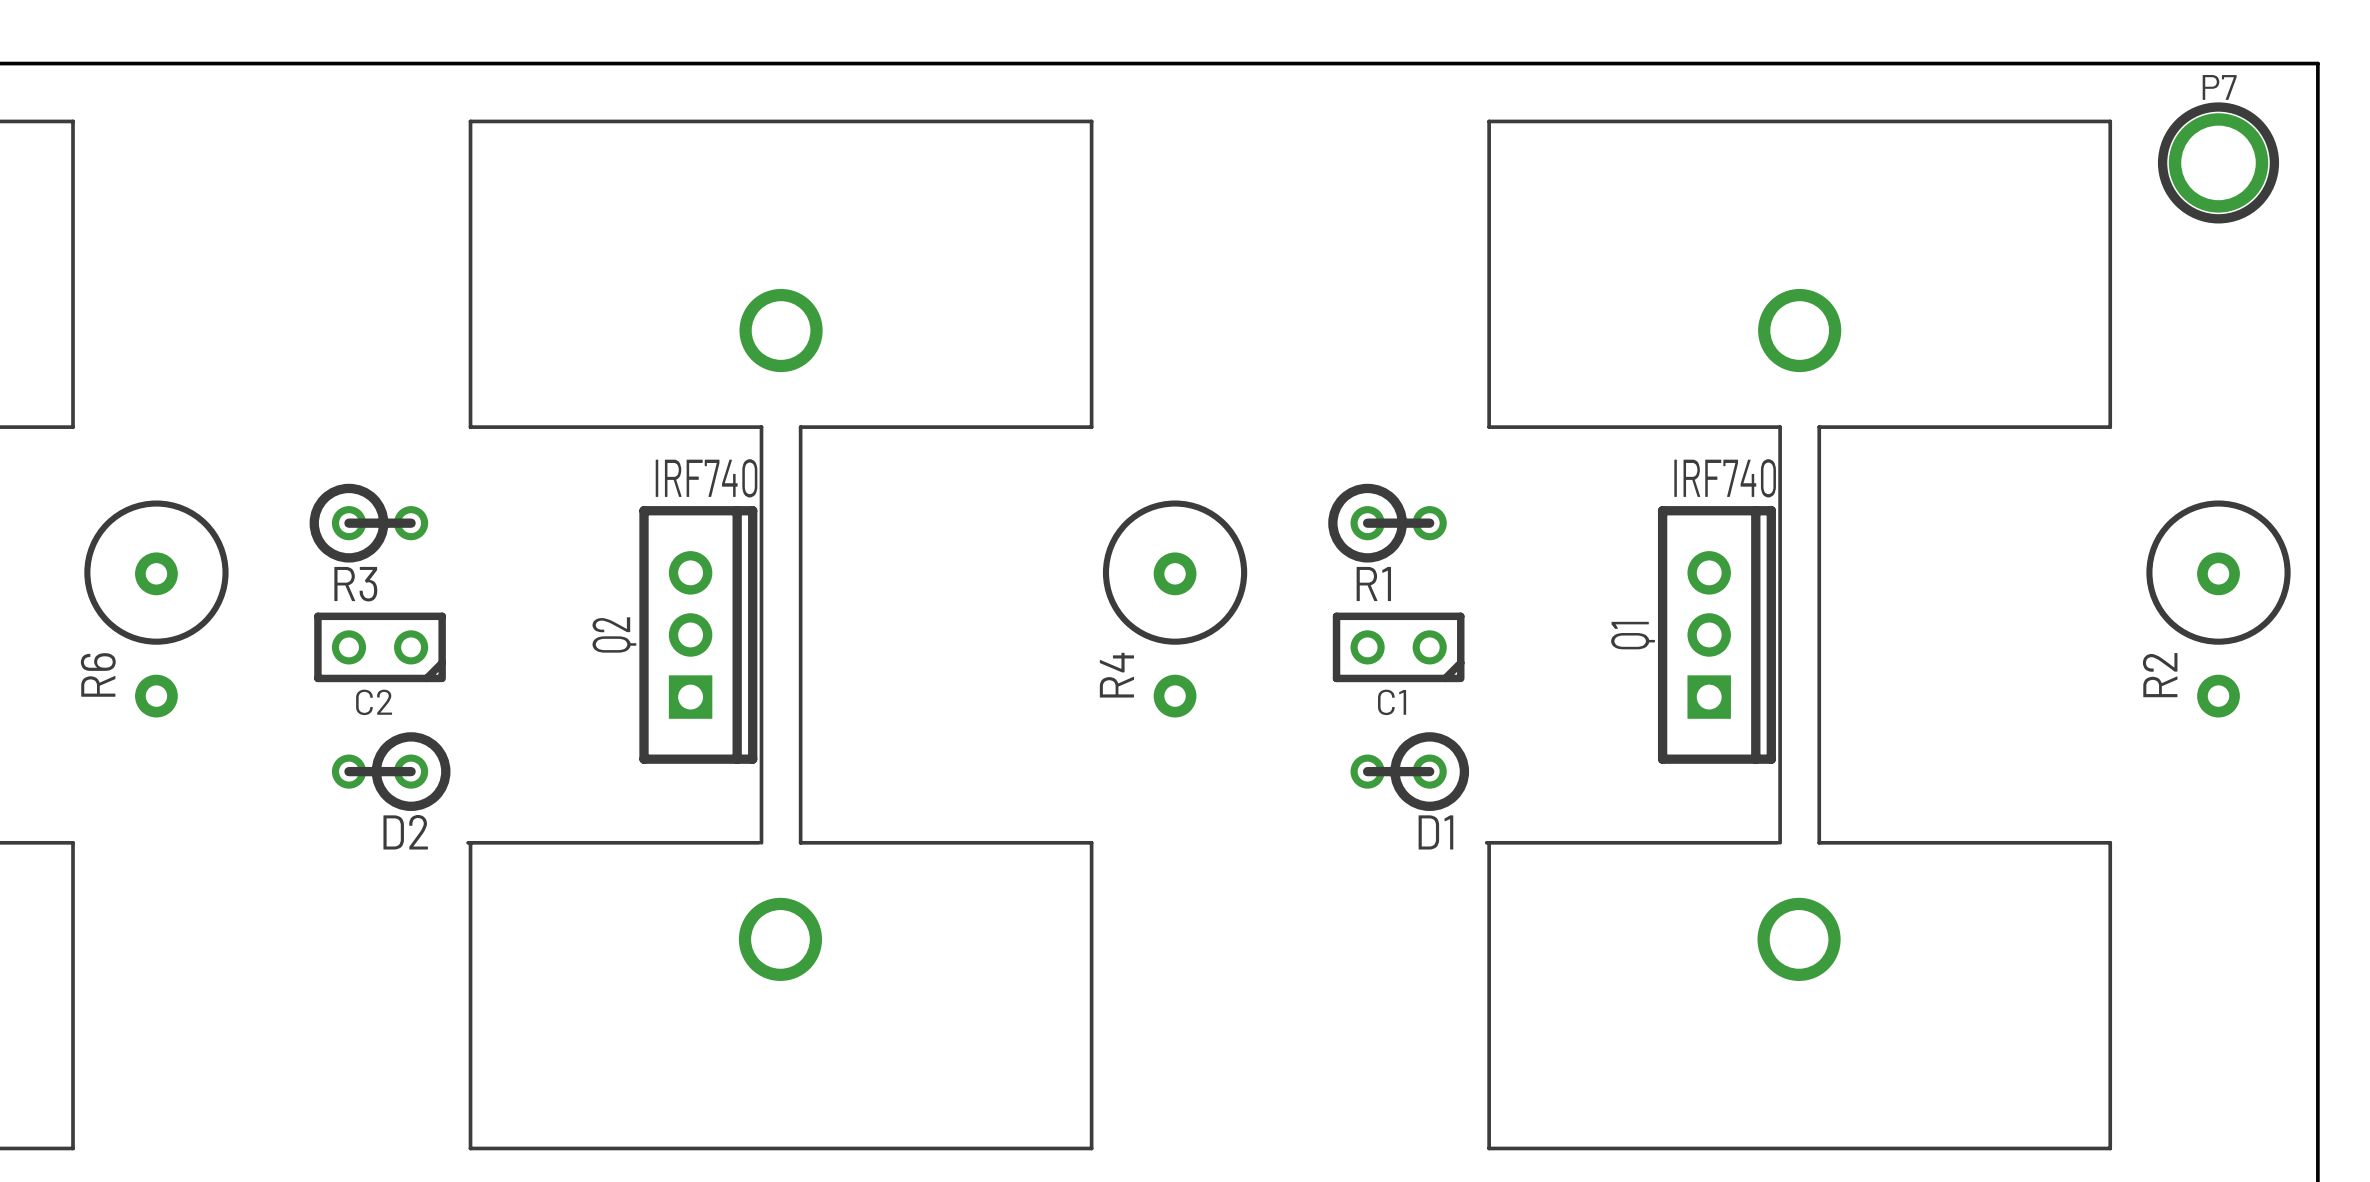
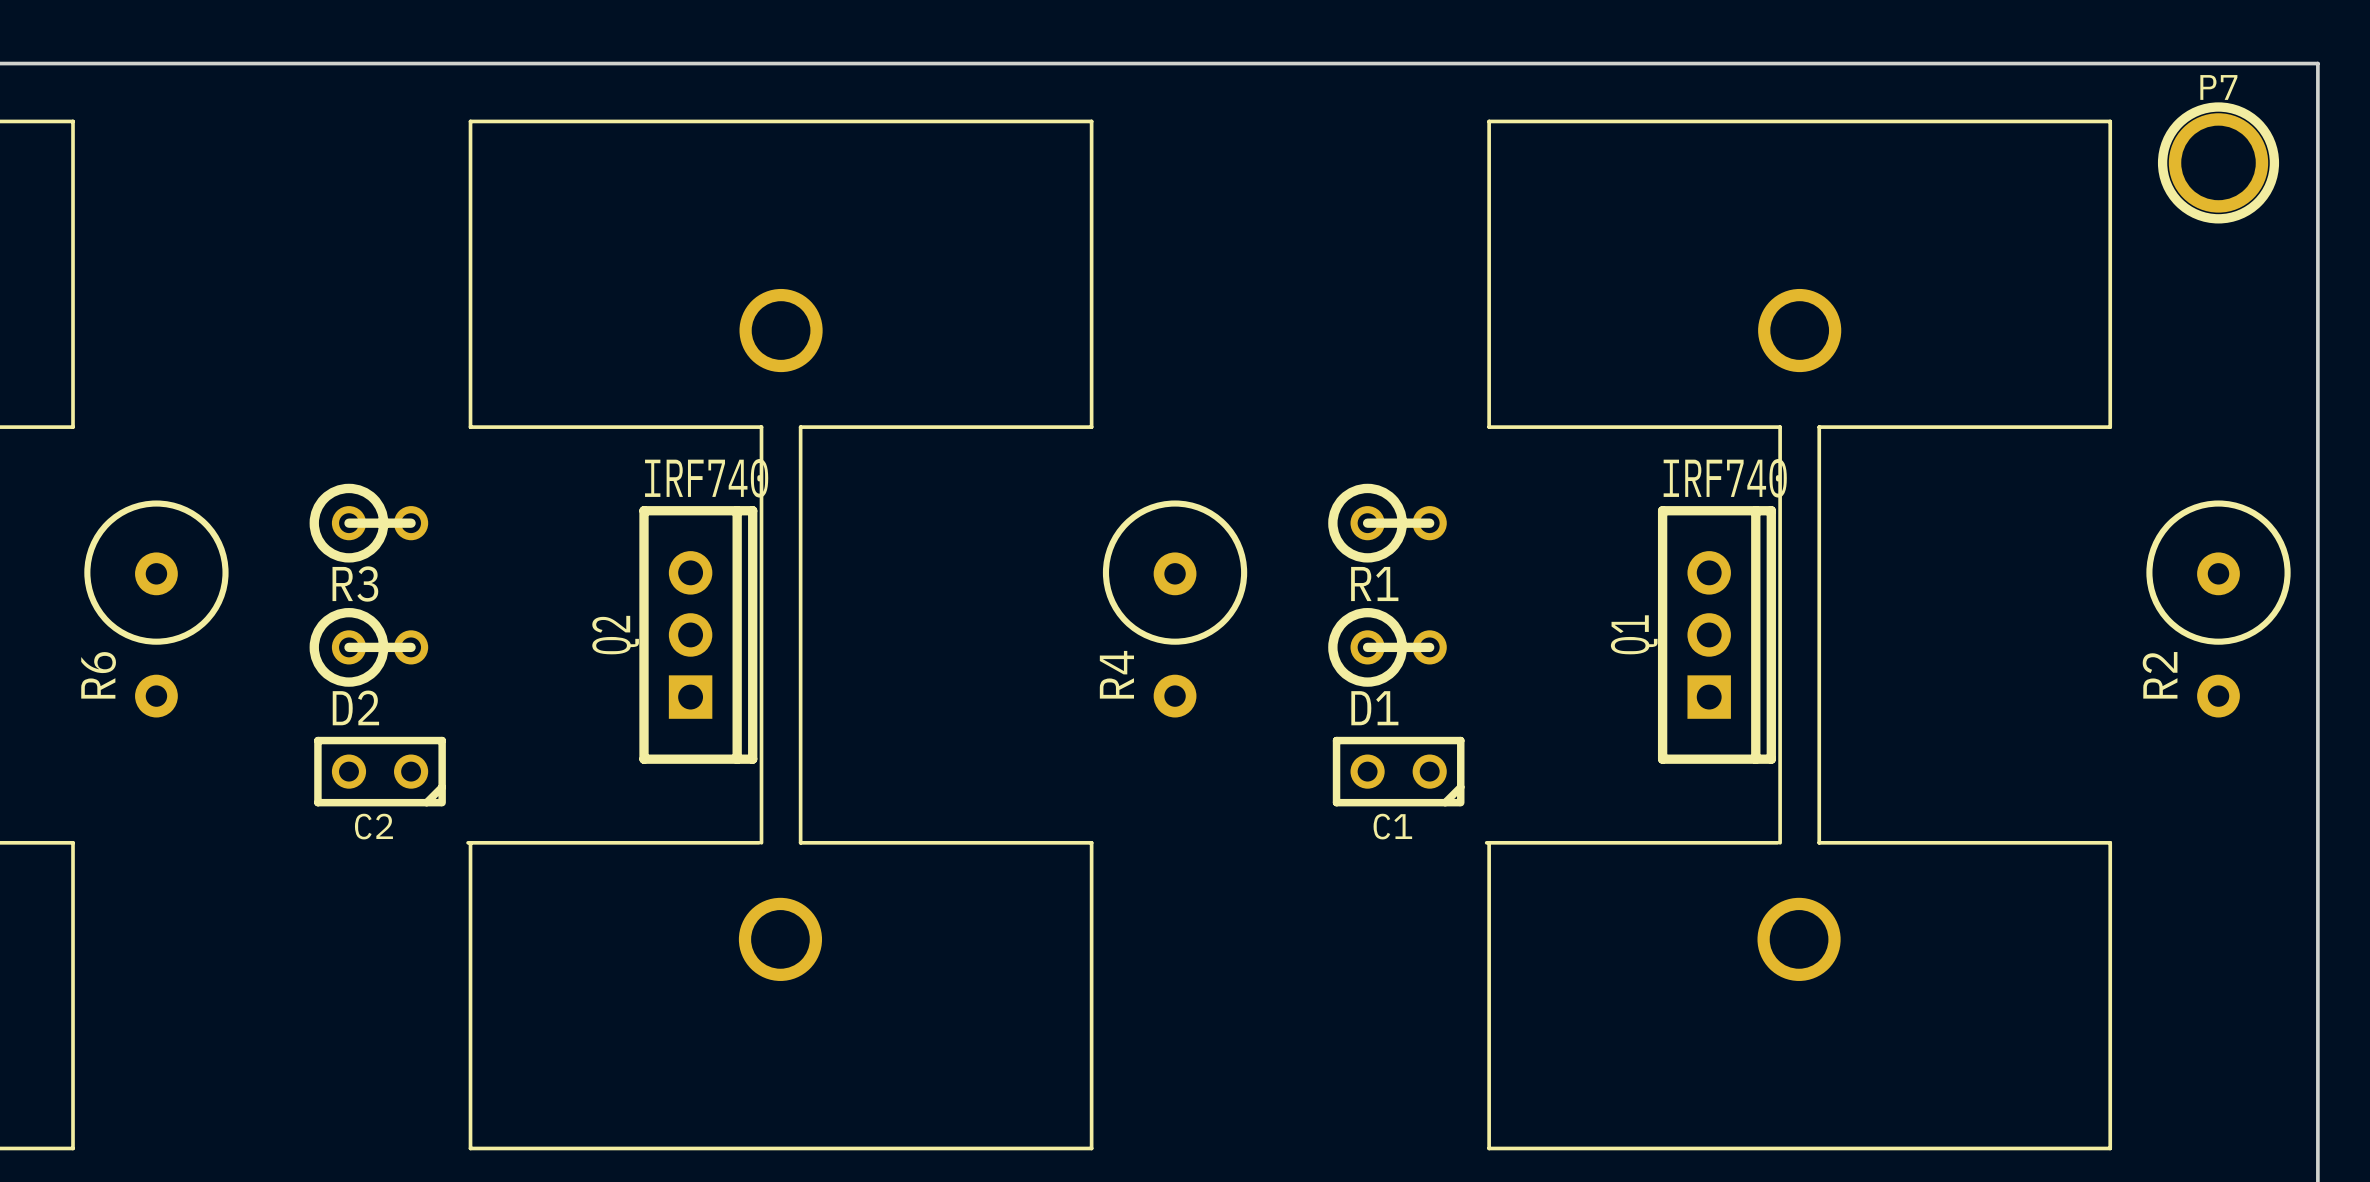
C2 position: (380, 647) -> (380, 771)
C1 position: (1398, 647) -> (1398, 771)
D2 rotation: 0° (391, 771) -> 180° (368, 647)
D2 position: (391, 771) -> (368, 647)
D1 rotation: 0° (1409, 771) -> 180° (1387, 647)
D1 position: (1409, 771) -> (1387, 647)

